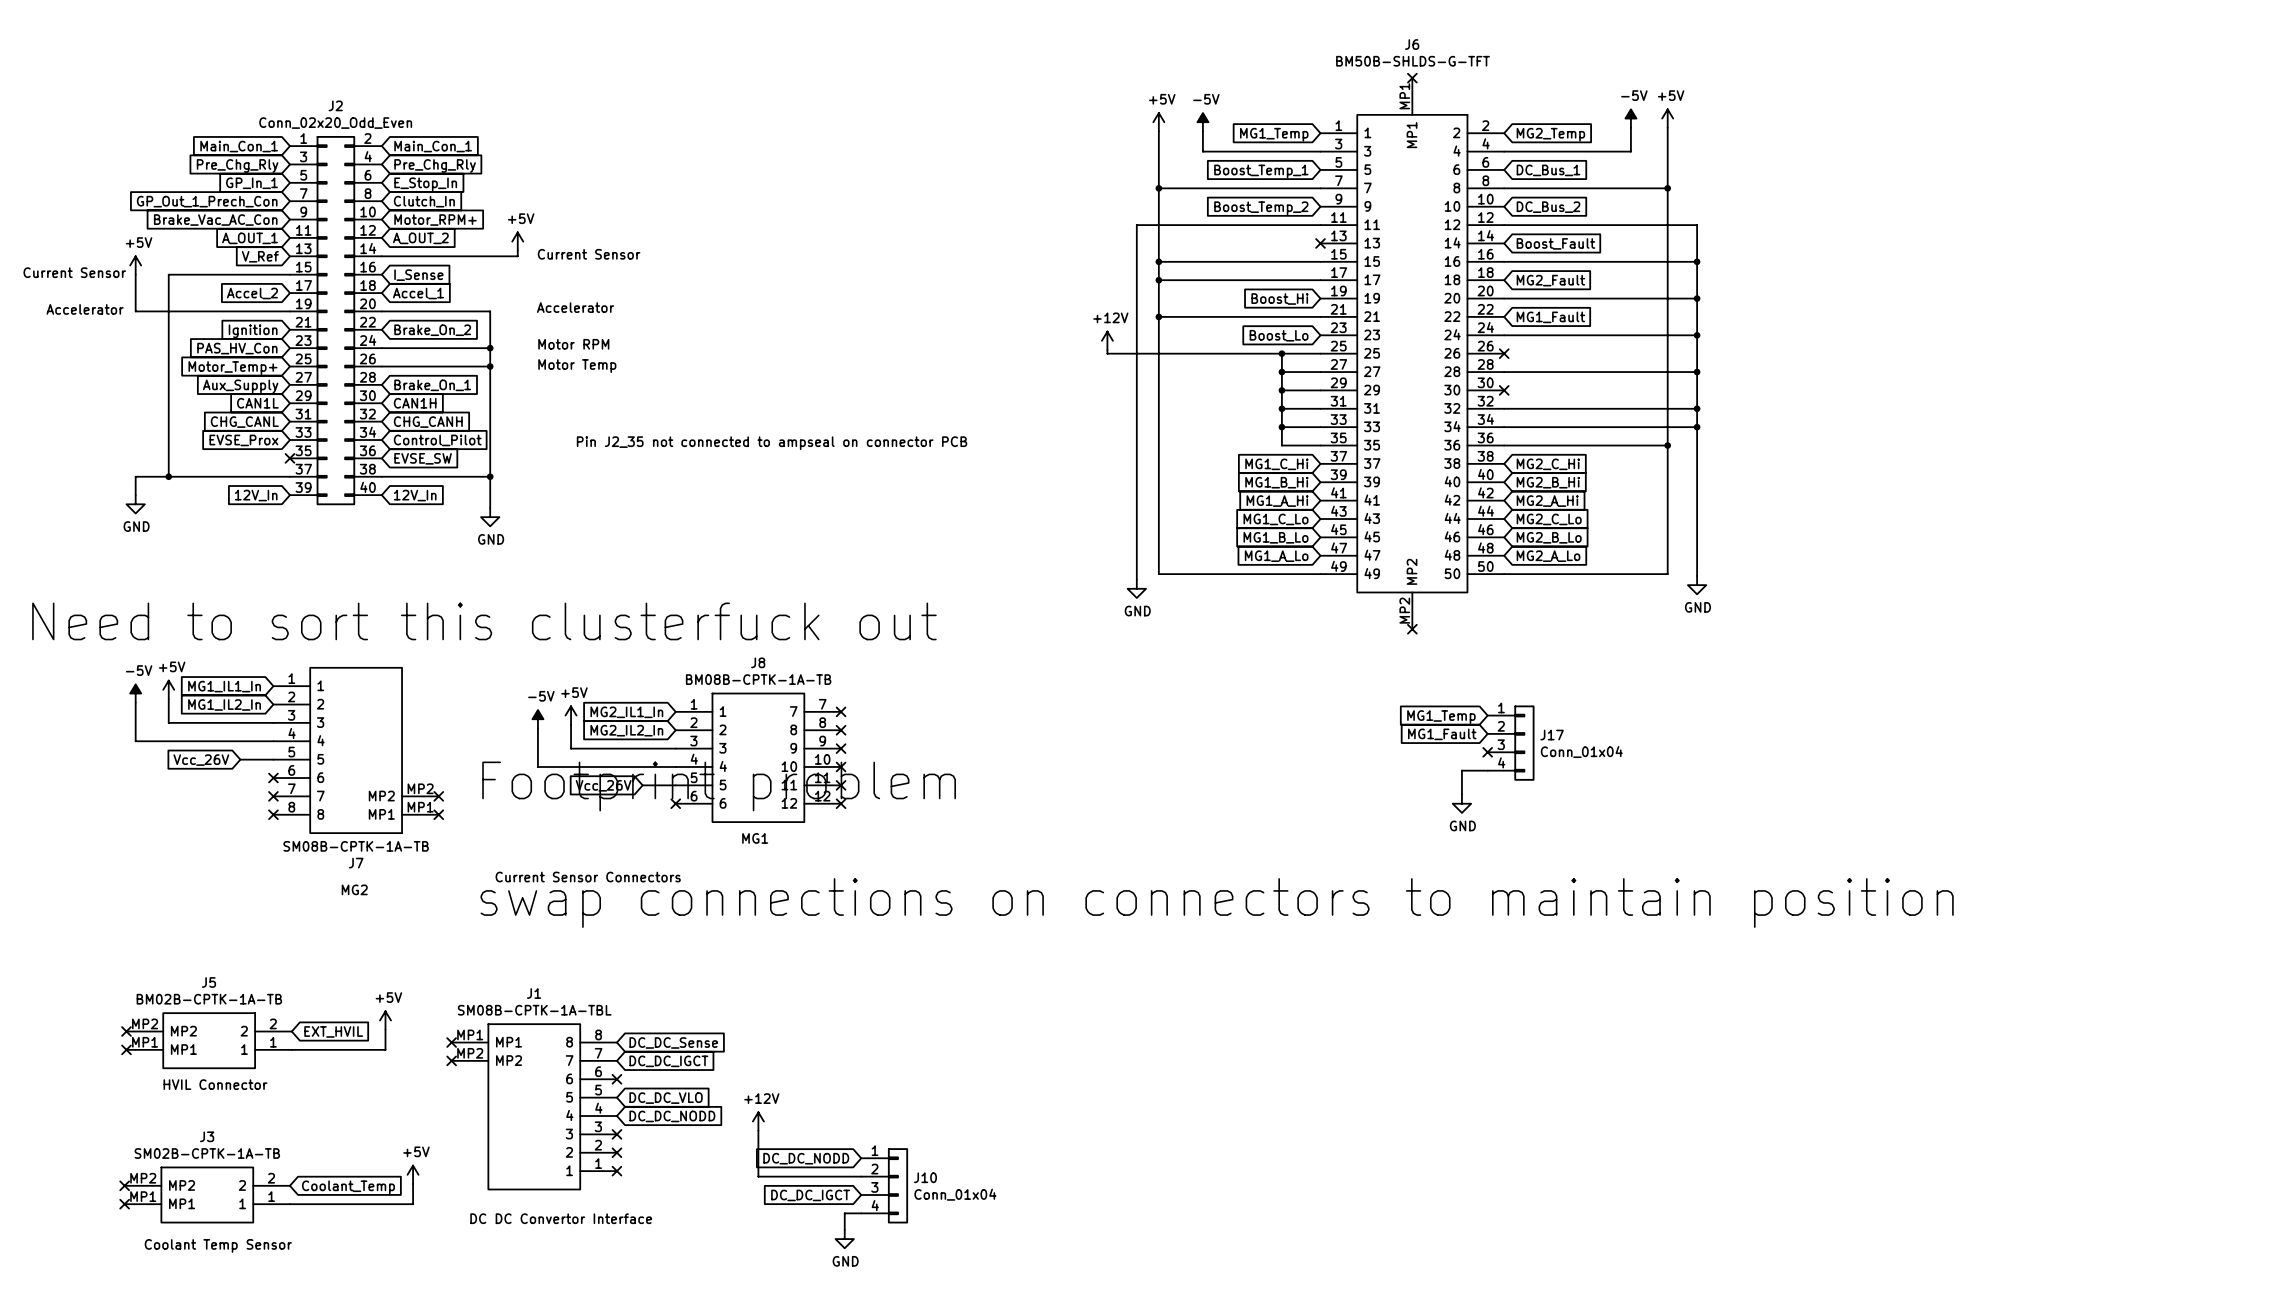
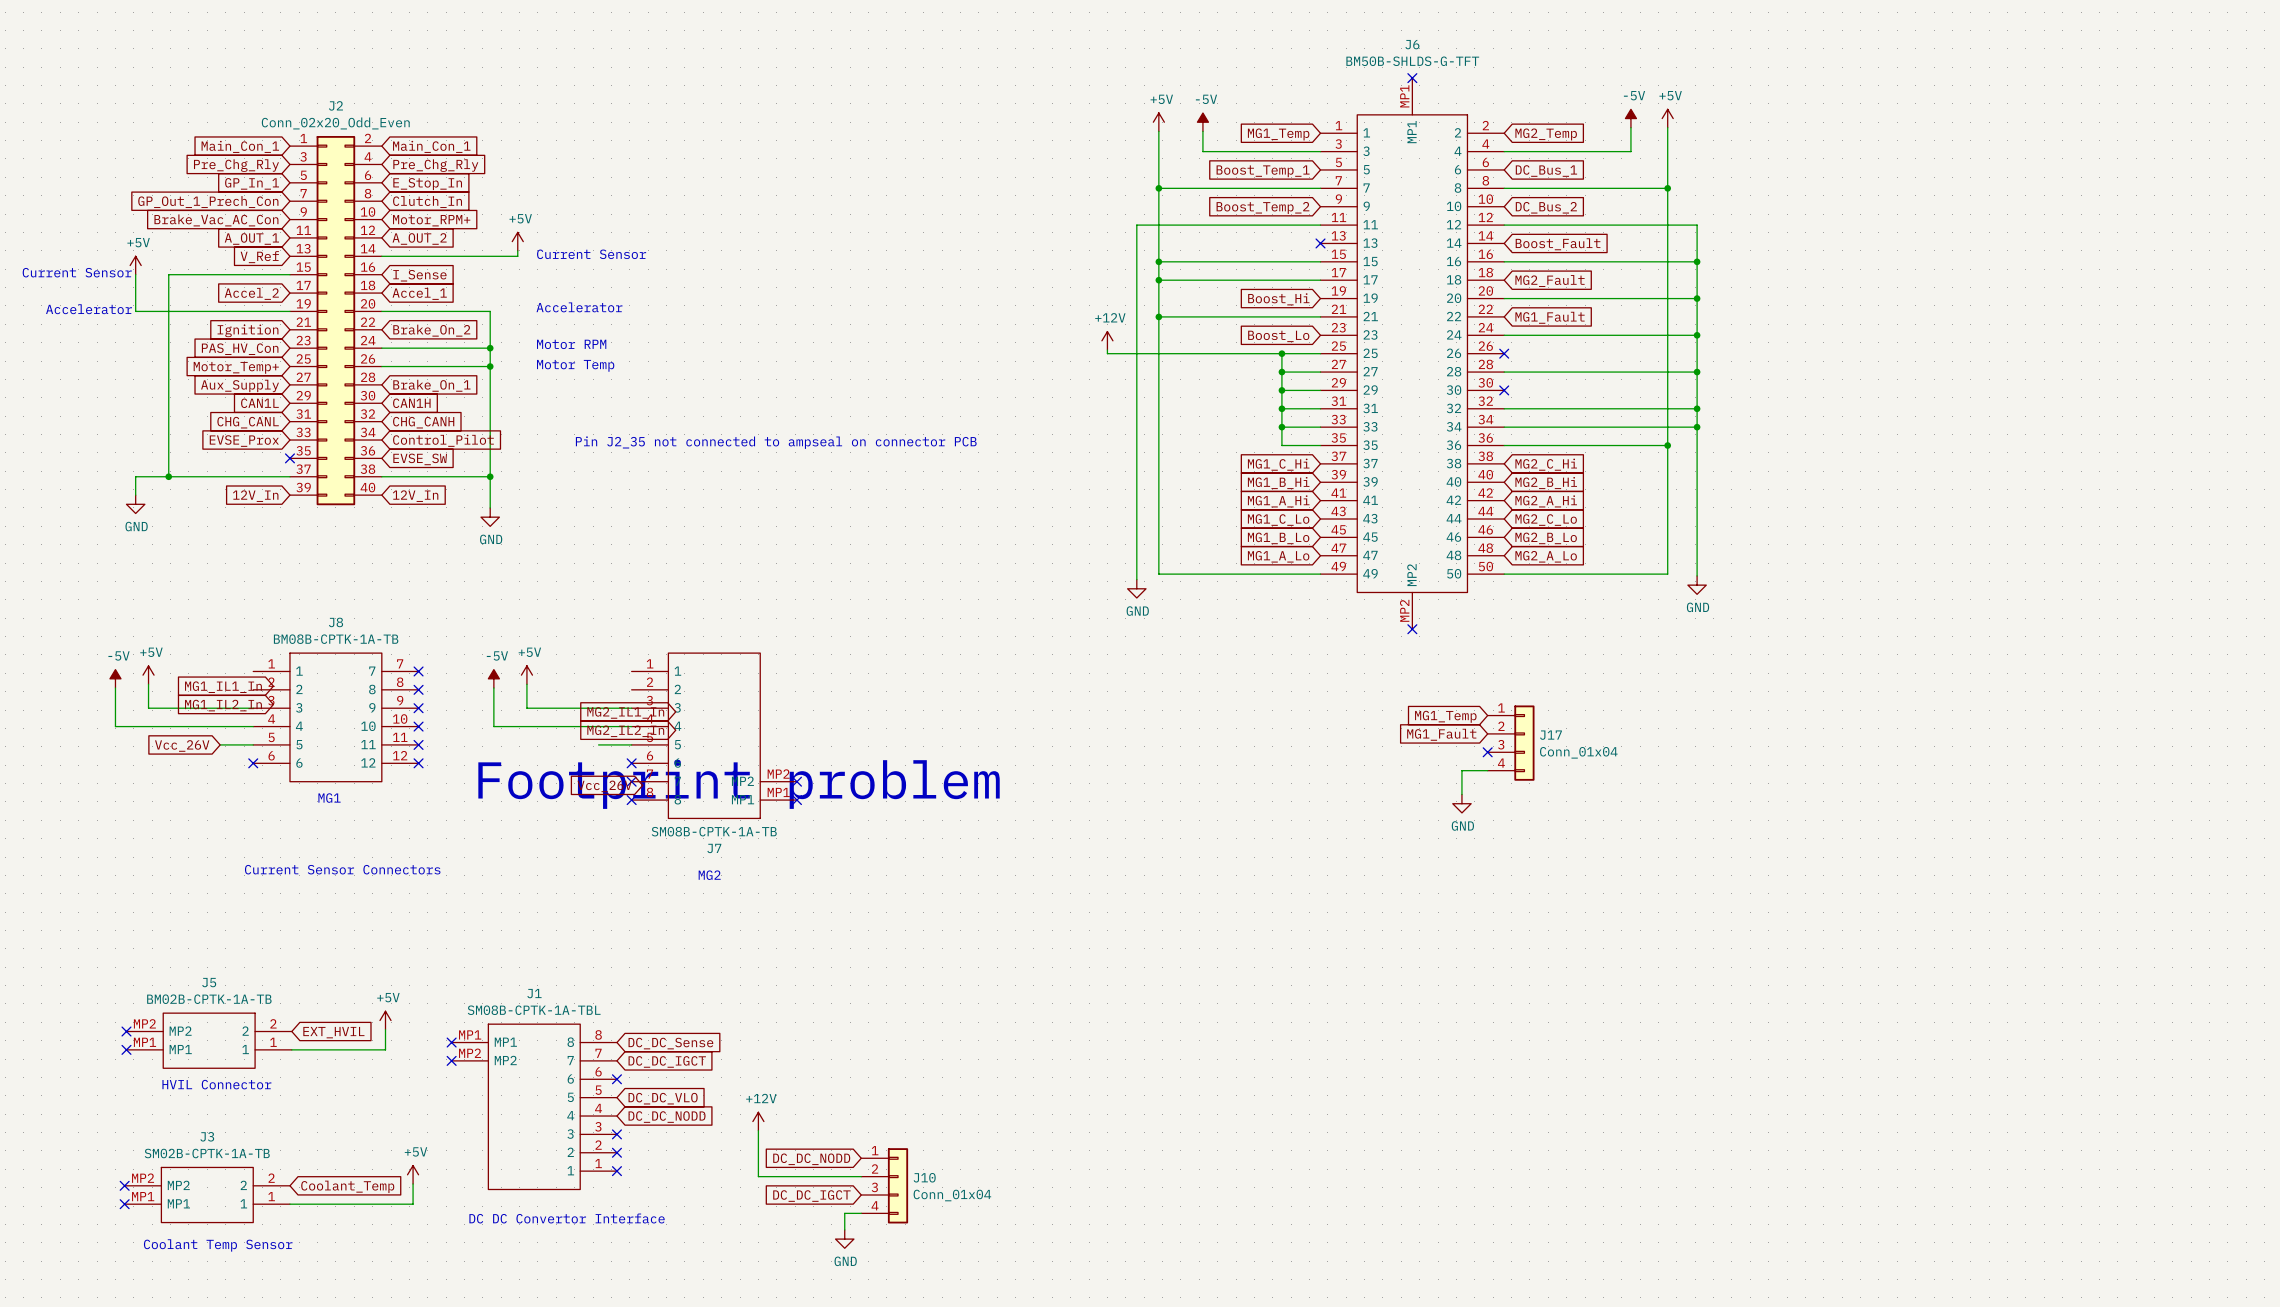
text: Need to sort this clusterfuck out (484, 621) -> none
no-connect mark: none -> (418, 671)
power symbol position: +5V (168, 689) -> +5V (148, 675)
no-connect mark: none -> (418, 689)
power symbol position: -5V (135, 693) -> -5V (115, 678)
wire: (168, 699) (168, 722) (273, 722) -> (148, 684) (148, 708) (253, 708)
wire: (135, 702) (135, 741) (273, 741) -> (115, 688) (115, 726) (253, 726)
no-connect mark: none -> (418, 708)
no-connect mark: (841, 711) -> none
power symbol position: +5V (571, 715) -> +5V (526, 675)
power symbol position: -5V (537, 719) -> -5V (493, 678)
wire: (571, 724) (571, 748) (675, 748) -> (526, 684) (526, 708) (631, 708)
no-connect mark: none -> (418, 726)
wire: (537, 728) (537, 766) (675, 766) -> (493, 688) (493, 726) (631, 726)
no-connect mark: (841, 730) -> none
no-connect mark: none -> (418, 744)
no-connect mark: (841, 748) -> none
J7 position: (356, 750) -> (714, 735)
J8 position: (758, 757) -> (335, 717)
wire: (240, 759) (273, 759) -> (220, 744) (253, 744)
global label position: Vcc_26V (201, 760) -> Vcc_26V (182, 745)
no-connect mark: none -> (253, 763)
no-connect mark: none -> (418, 763)
no-connect mark: none -> (631, 763)
no-connect mark: (841, 766) -> none
no-connect mark: (273, 778) -> none
no-connect mark: none -> (631, 781)
no-connect mark: none -> (796, 781)
wire: (642, 785) (675, 785) -> (598, 744) (631, 744)
no-connect mark: (841, 785) -> none
no-connect mark: (273, 796) -> none
no-connect mark: (438, 796) -> none
text: none -> MG1 (329, 798)
no-connect mark: none -> (631, 800)
no-connect mark: none -> (796, 800)
no-connect mark: (675, 803) -> none
no-connect mark: (841, 803) -> none
no-connect mark: (273, 814) -> none
no-connect mark: (438, 814) -> none
text: MG1 (755, 838) -> none
text: none -> Current Sensor Connectors (342, 869)
text: none -> MG2 (709, 875)
text: Current Sensor Connectors (588, 877) -> none
text: MG2 (354, 889) -> none
text: swap connections on connectors to maintain position (1217, 902) -> none

